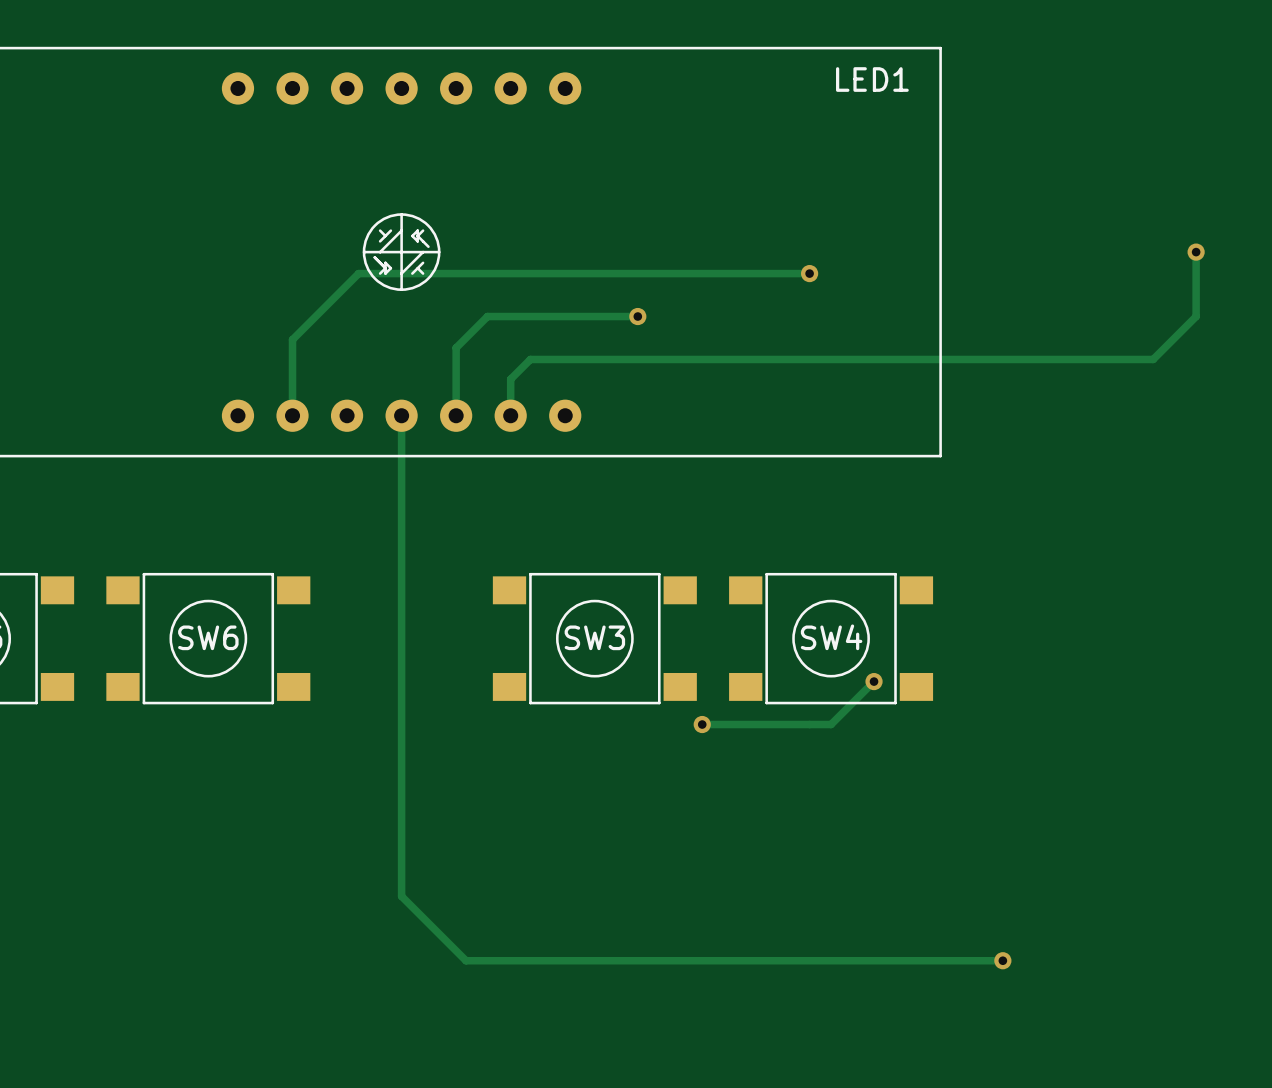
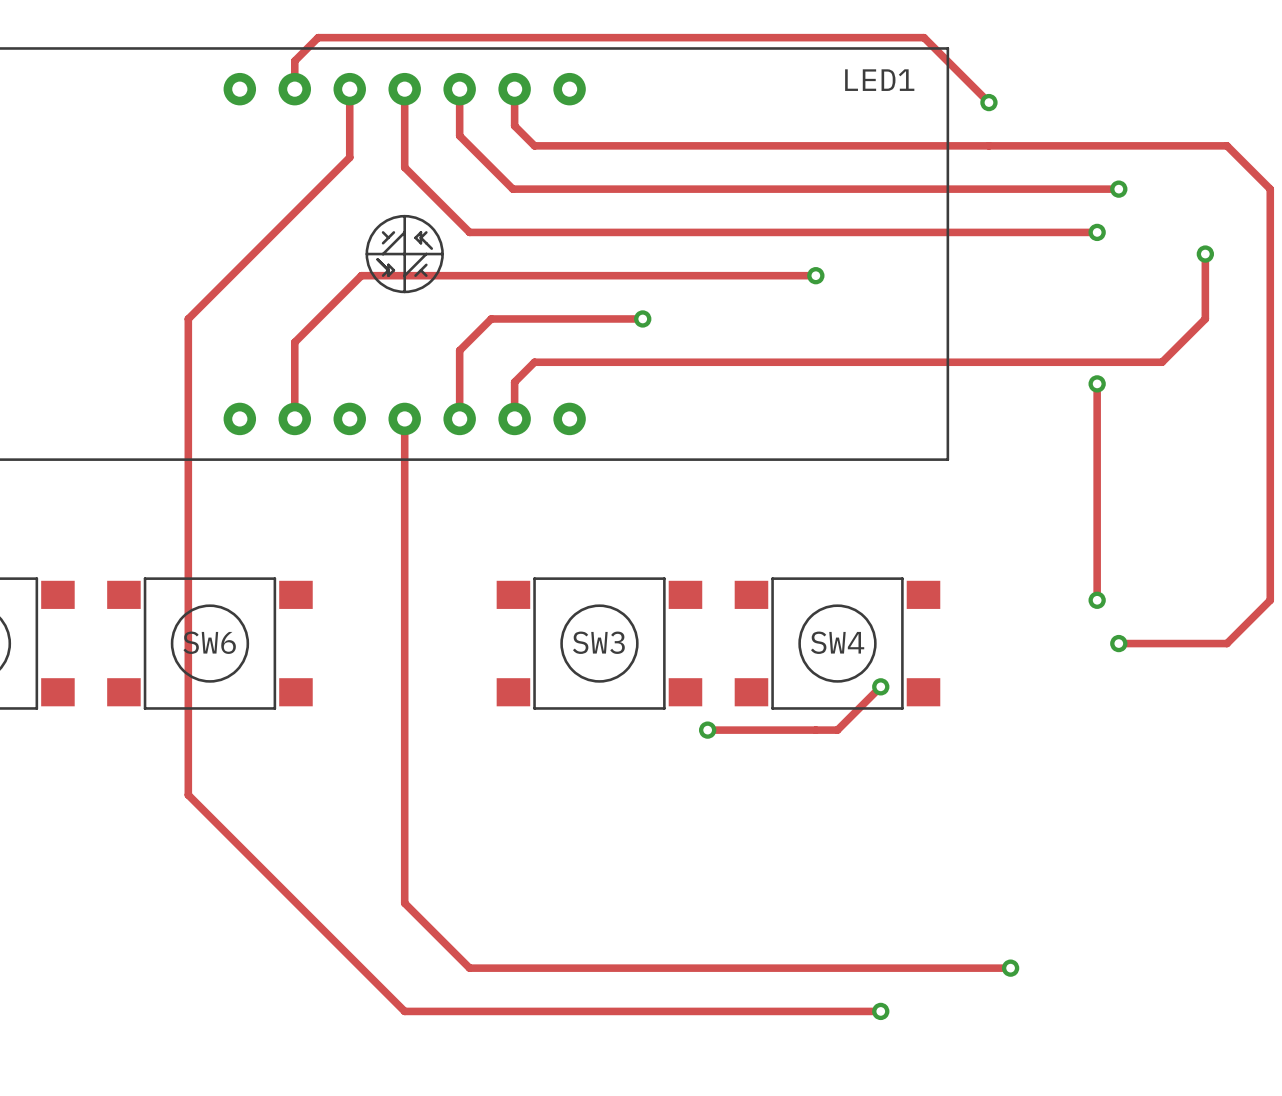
track: none -> (294, 89) (294, 61) (318, 37) (924, 37) (988, 102)
track: none -> (349, 89) (349, 157) (188, 318) (188, 795) (404, 1011) (880, 1011)
track: none -> (404, 89) (404, 167) (469, 232) (1097, 232)
track: none -> (459, 89) (459, 135) (512, 189) (1118, 189)
track: none -> (514, 89) (514, 125) (534, 145) (1226, 145) (1270, 189) (1270, 600) (1226, 643) (1118, 643)
via: none -> (988, 102)
via: none -> (1118, 189)
via: none -> (1097, 232)
track: none -> (1097, 383) (1097, 600)
via: none -> (1097, 383)
via: none -> (1097, 600)
via: none -> (1118, 643)
via: none -> (880, 1011)

